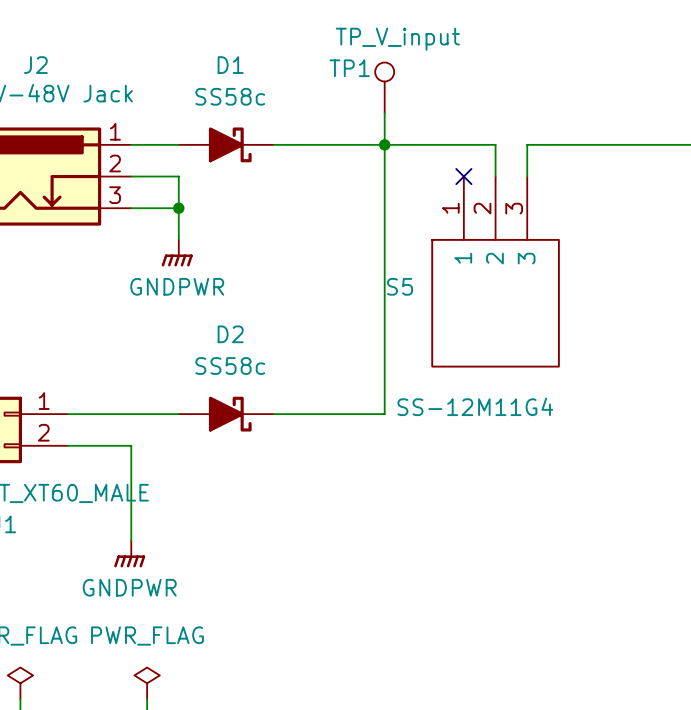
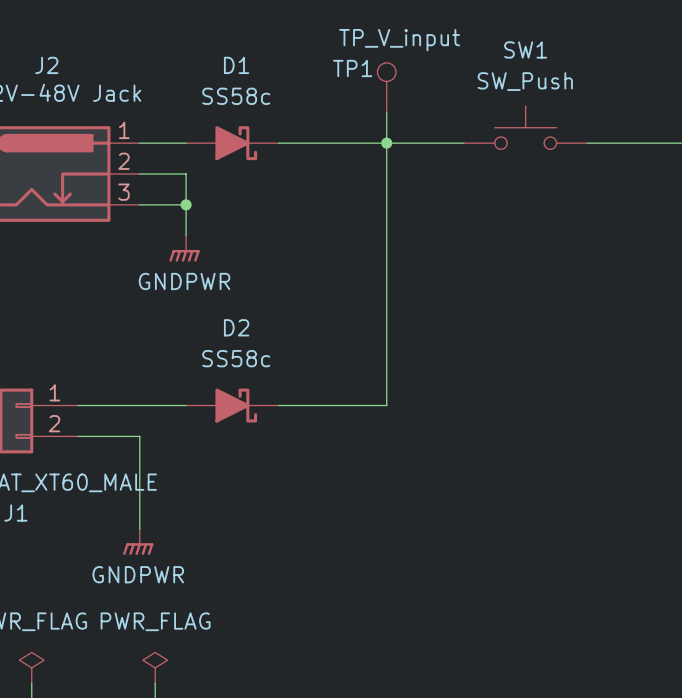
SW1: none -> SW_Push (525, 127)
wire: (463, 144) (495, 144) (495, 176) -> none
wire: (590, 144) (527, 144) (527, 176) -> none
no-connect mark: (463, 176) -> none
S5: SS-12M11G4 (495, 272) -> none

